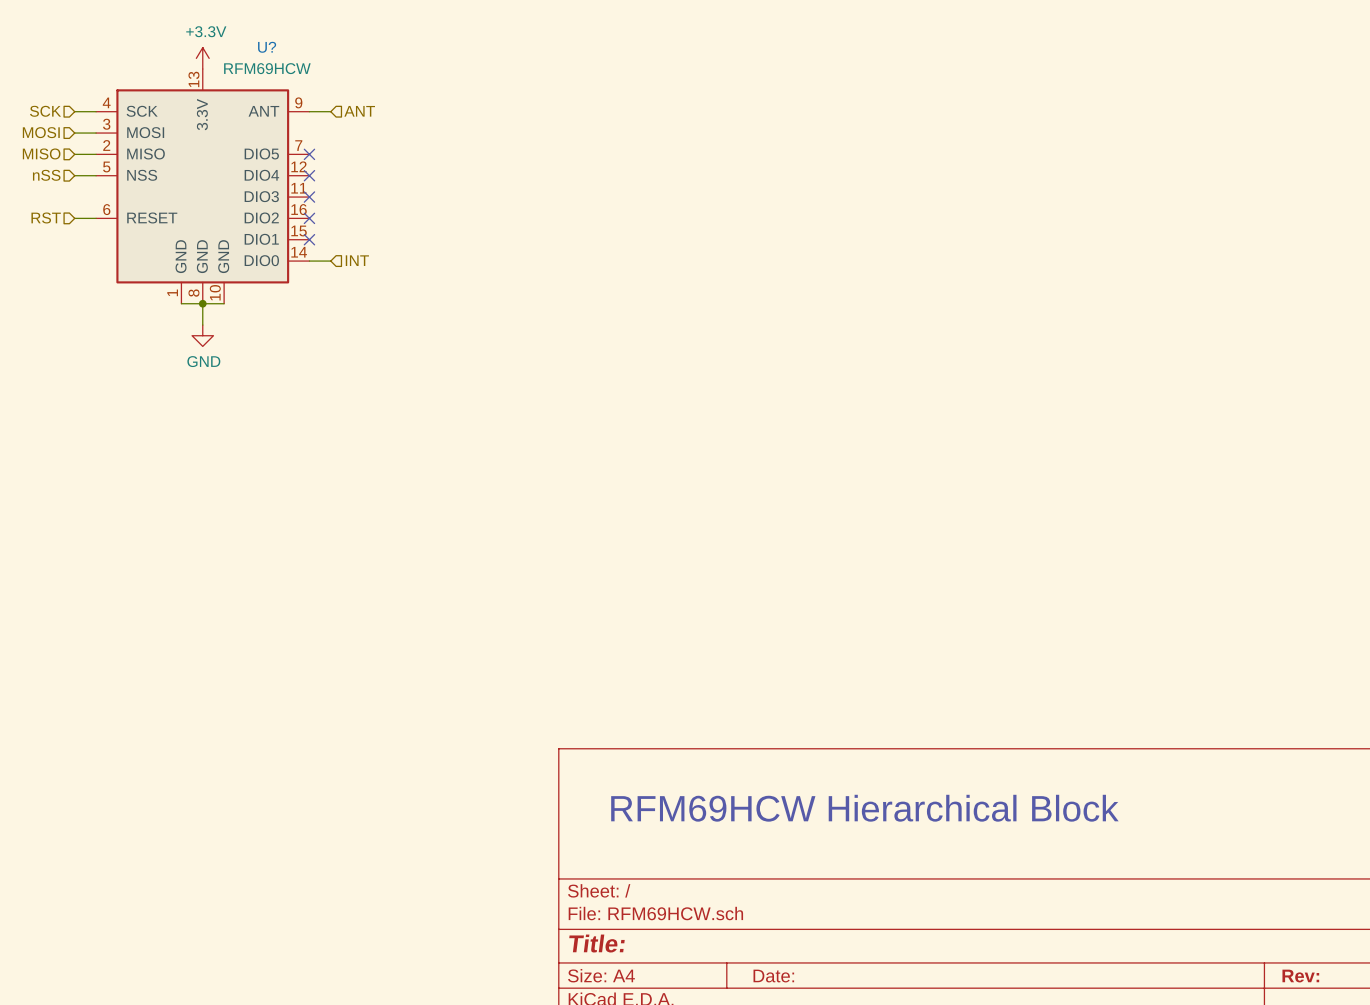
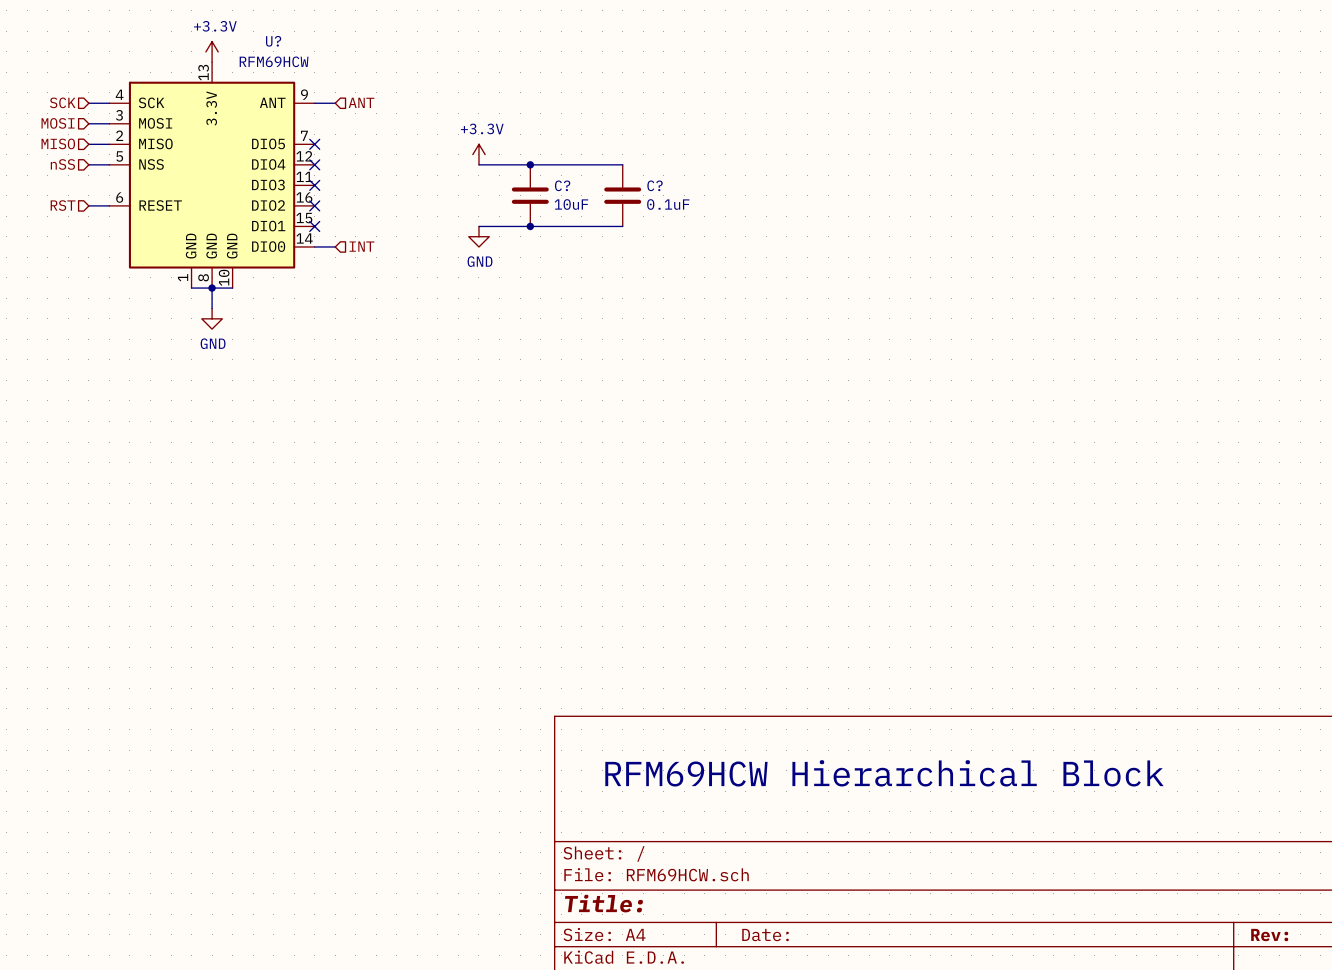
power symbol: none -> +3.3V (478, 154)
wire: none -> (478, 164) (622, 164)
junction: none -> (530, 164)
C?: none -> 10uF (530, 195)
C?: none -> 0.1uF (622, 195)
wire: none -> (478, 226) (622, 226)
junction: none -> (530, 226)
power symbol: none -> GND (478, 236)

